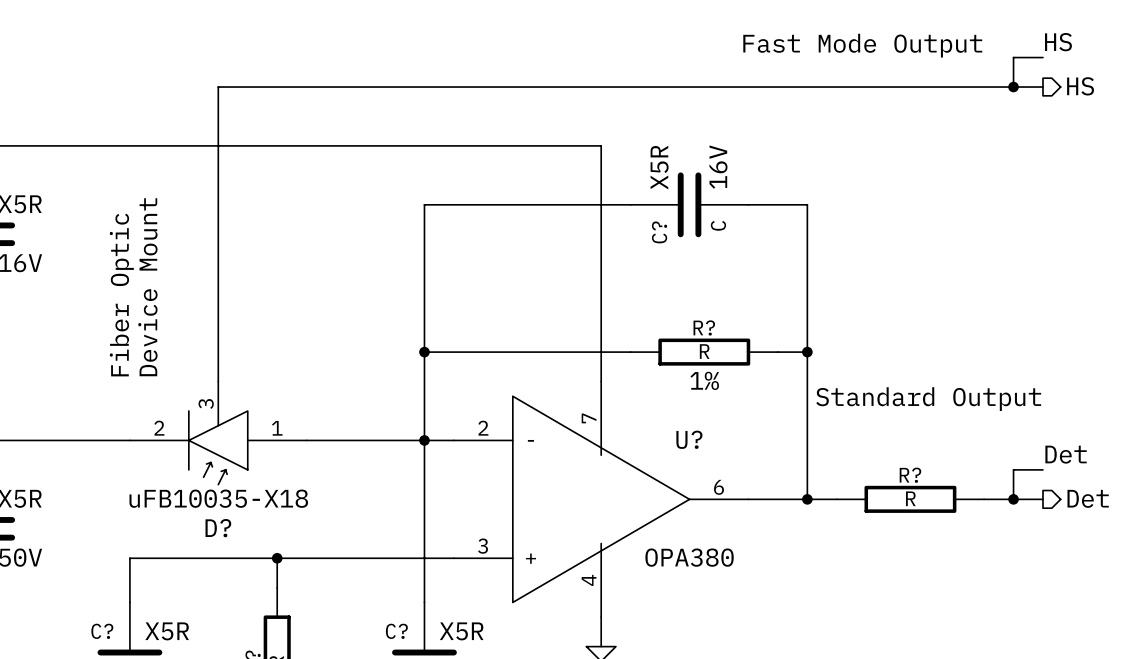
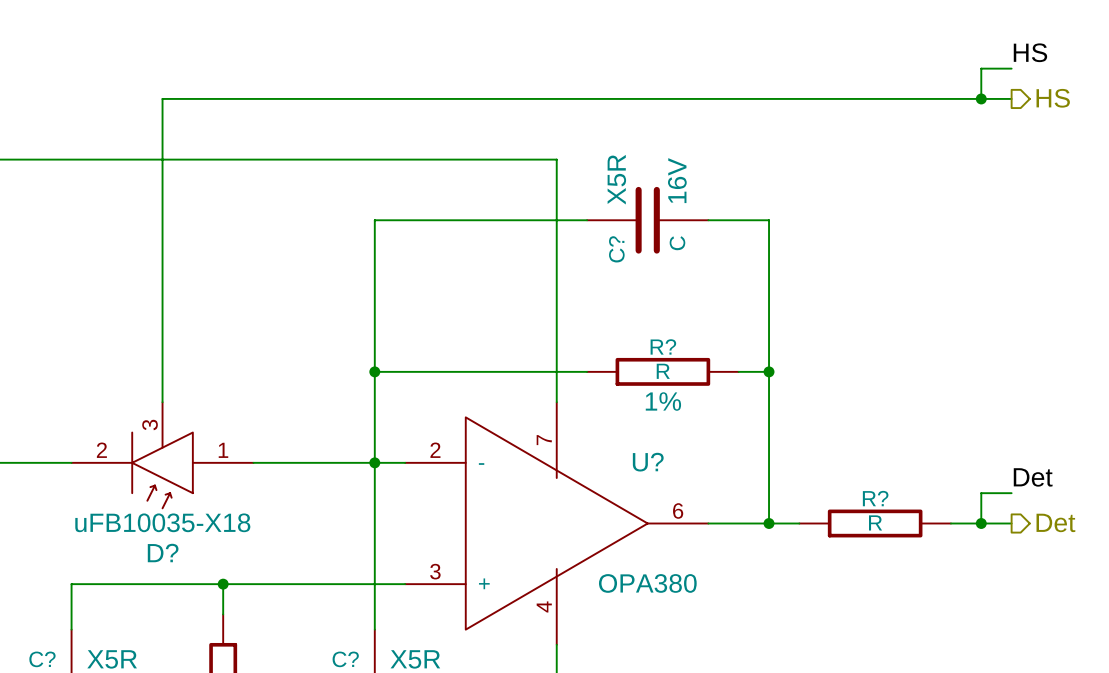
text: Fast Mode Output (862, 45) -> none
text: Device Mount (147, 287) -> none
text: Fiber Optic (121, 295) -> none
text: Standard Output (928, 399) -> none

